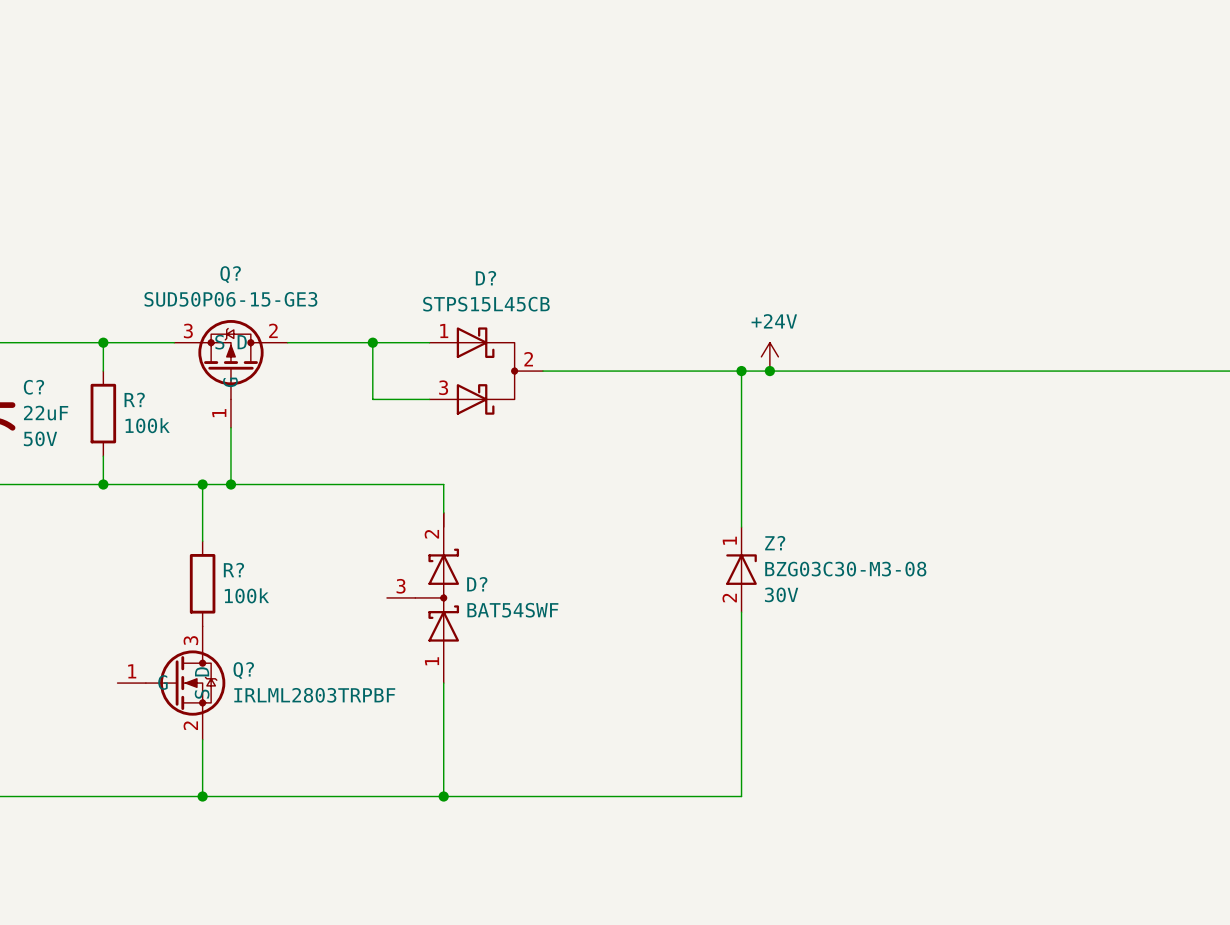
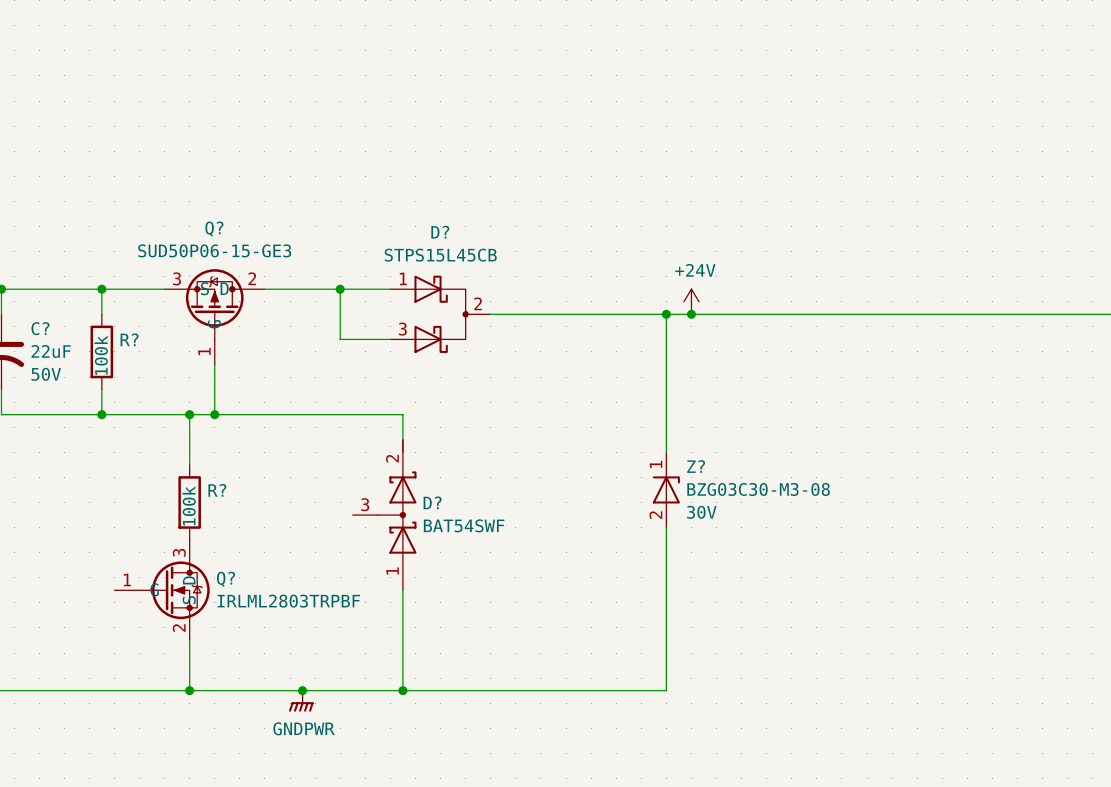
R? text rotation: 0° (147, 425) -> 90° counterclockwise (101, 355)
R? text rotation: 0° (246, 595) -> 90° counterclockwise (189, 505)
junction: none -> (302, 690)
power symbol: none -> GNDPWR (301, 701)

